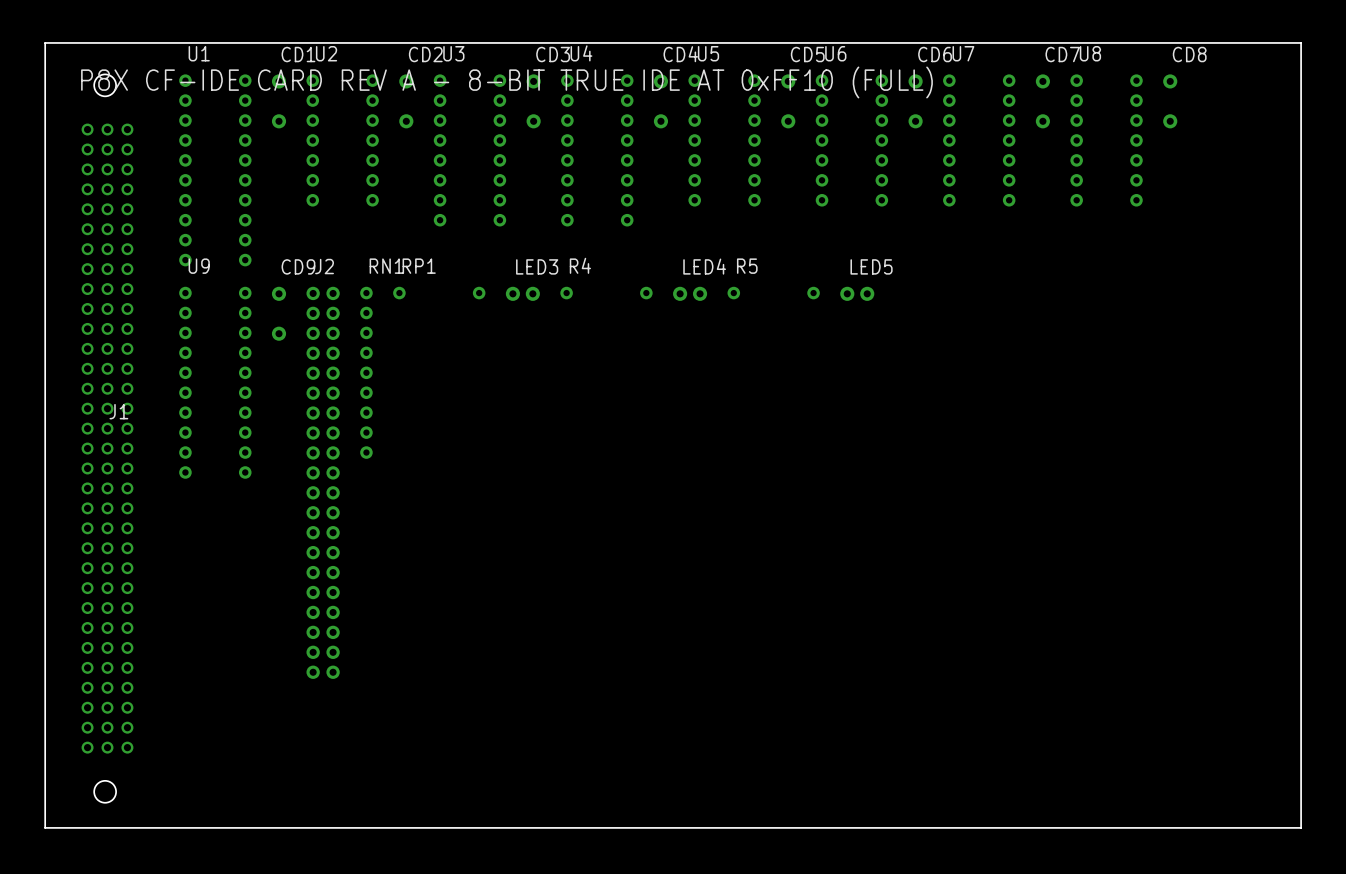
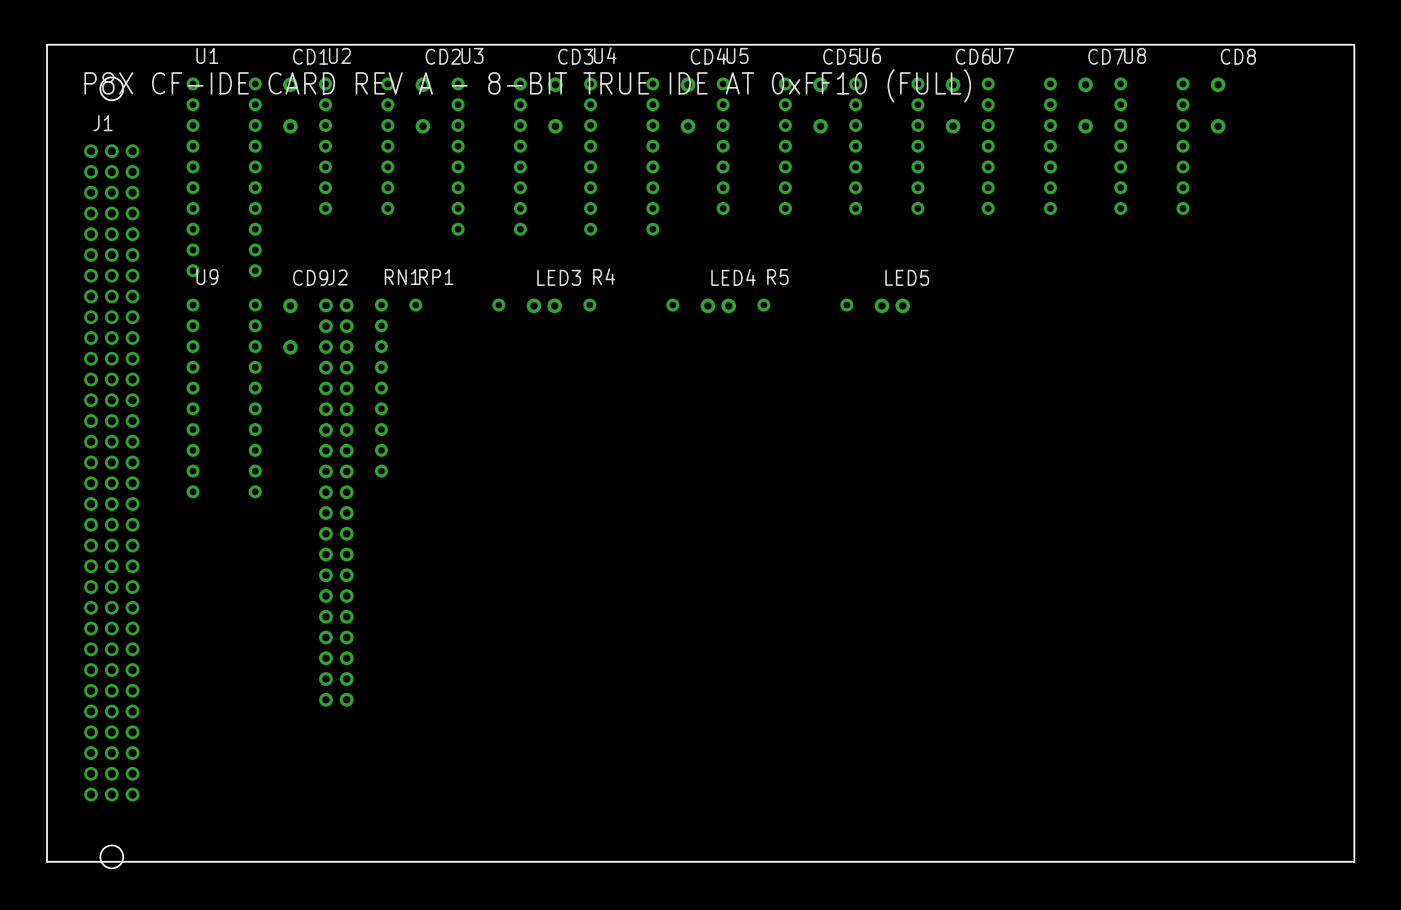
J1 footprint: [81, 74, 134, 803] -> [84, 77, 140, 869]
J1 name position: J1 (118, 411) -> J1 (102, 123)

